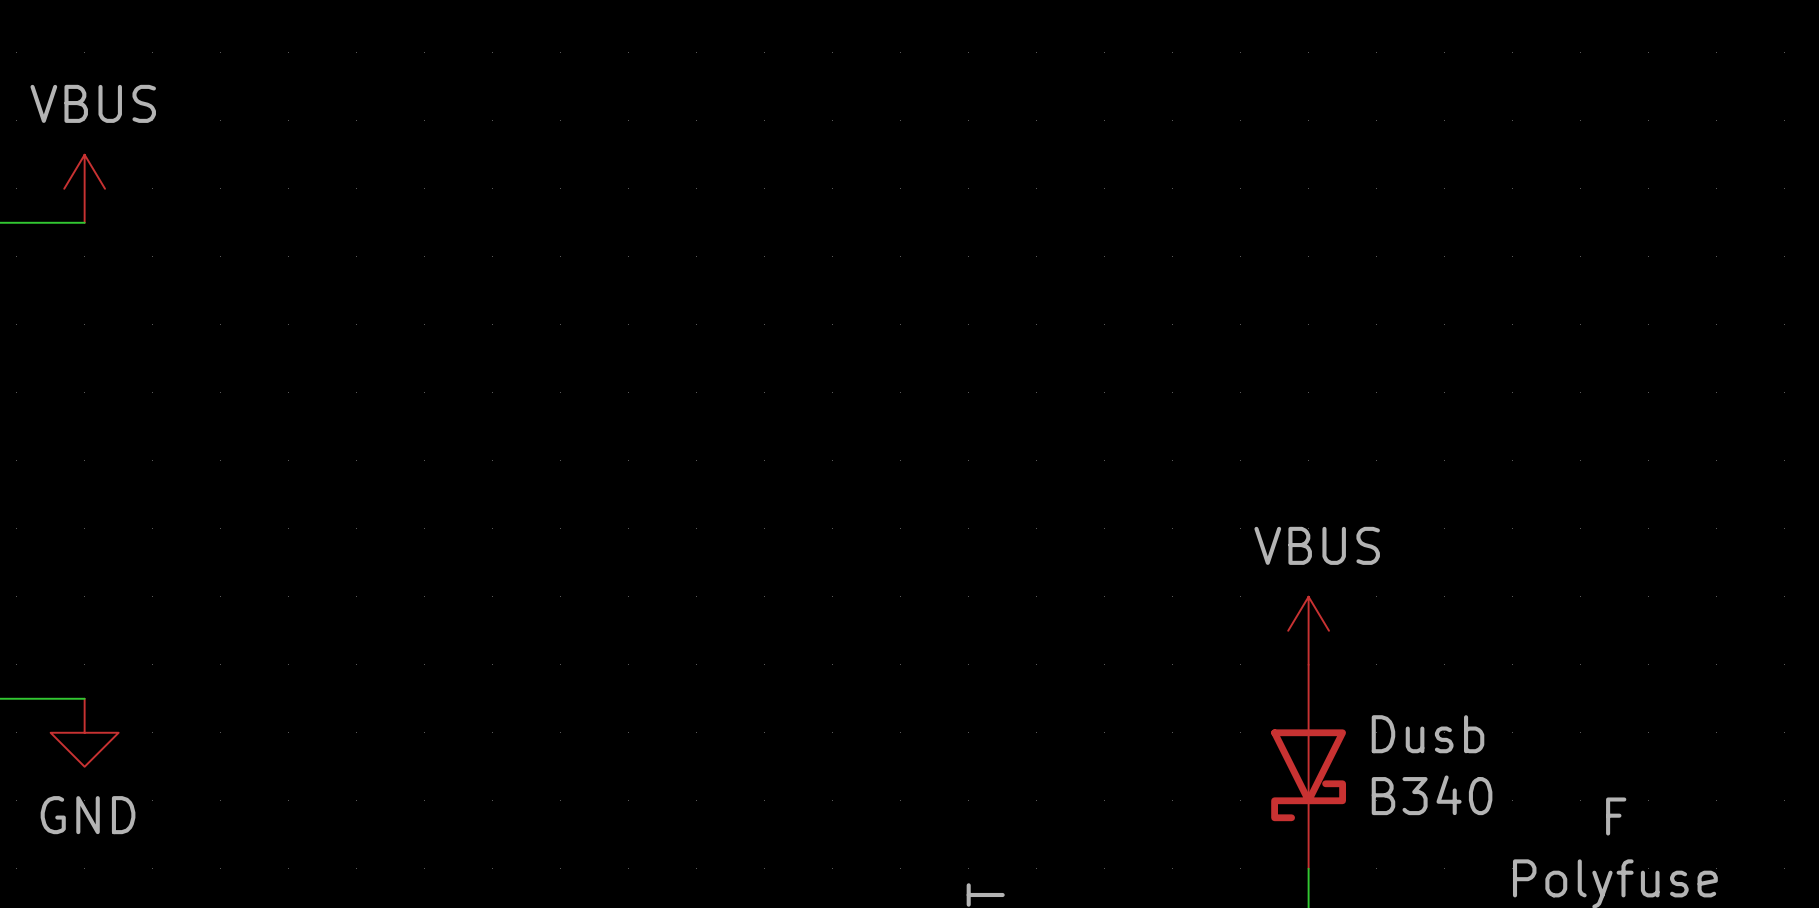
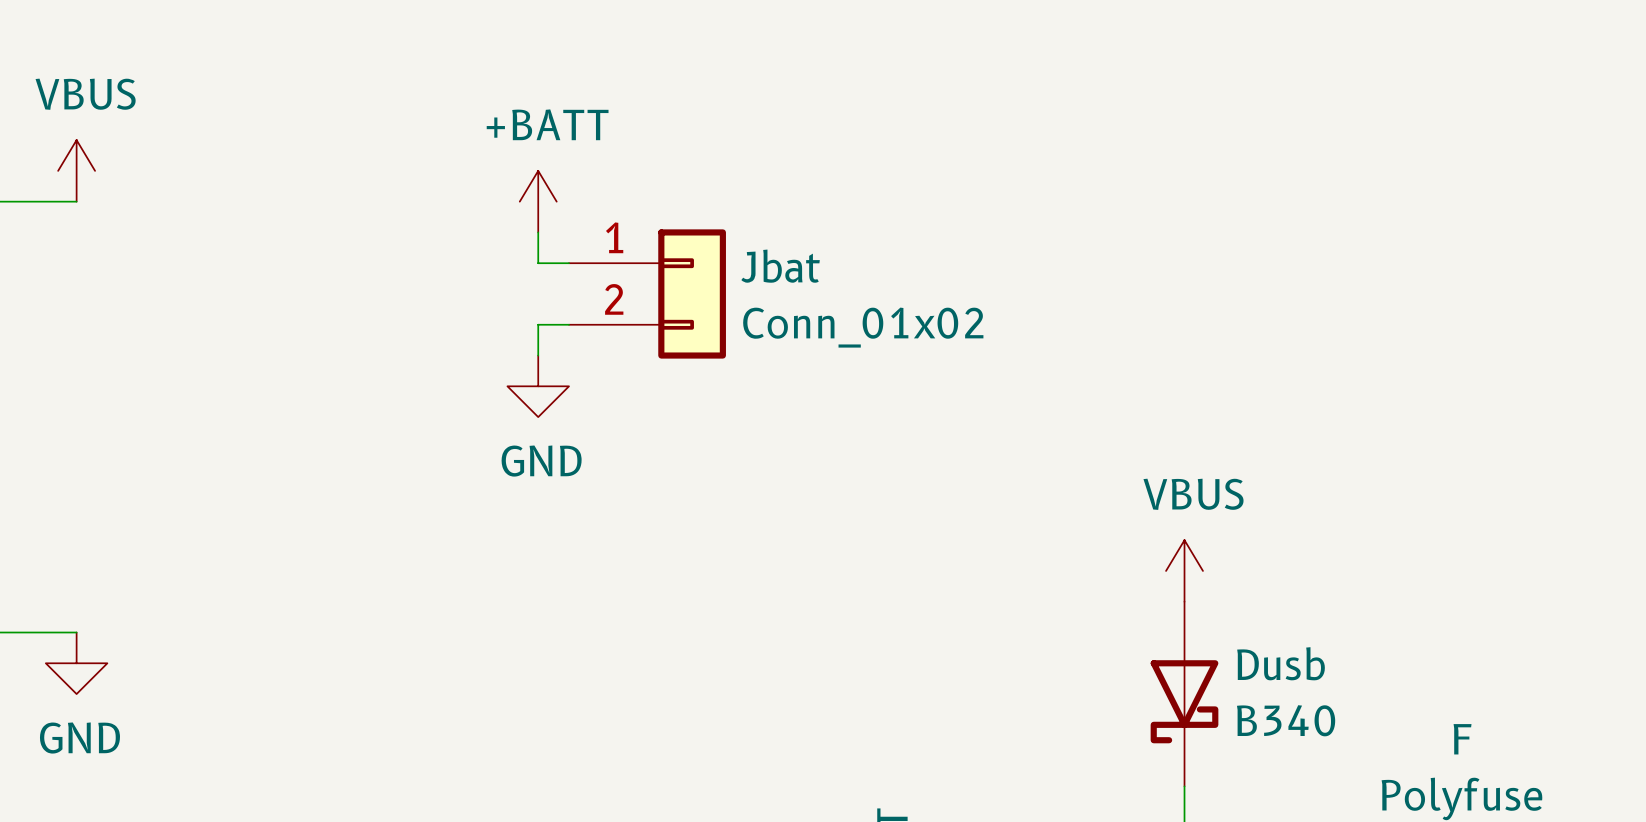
power symbol: none -> +BATT (538, 201)
wire: none -> (538, 232) (538, 263) (569, 263)
Jbat: none -> Conn_01x02 (647, 293)
wire: none -> (569, 324) (538, 324) (538, 355)
power symbol: none -> GND (538, 386)

